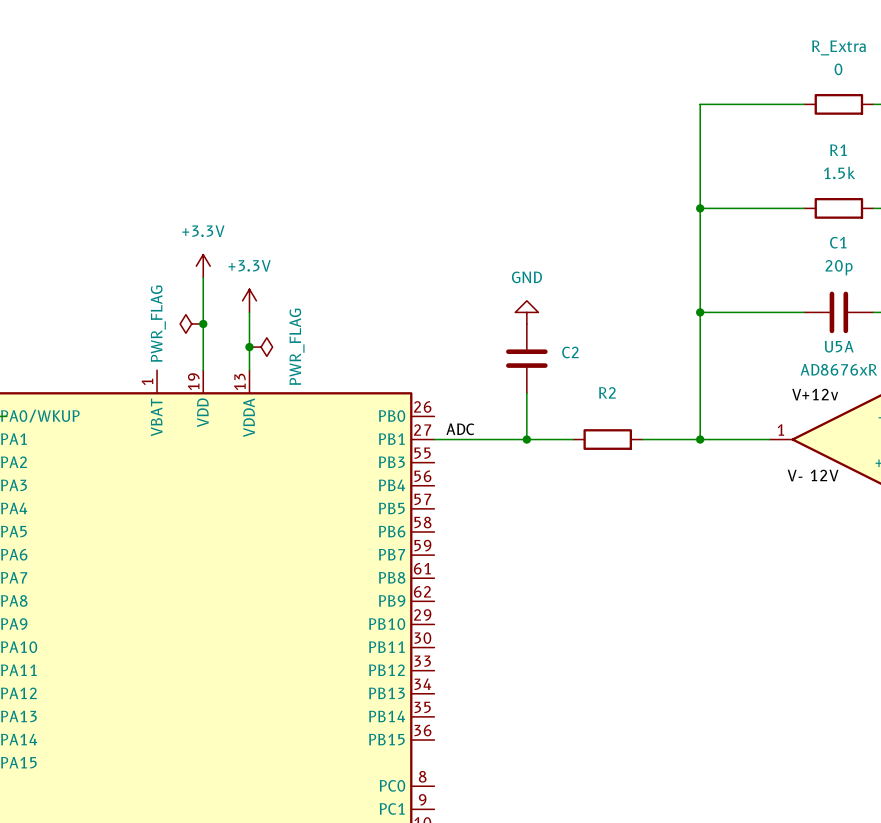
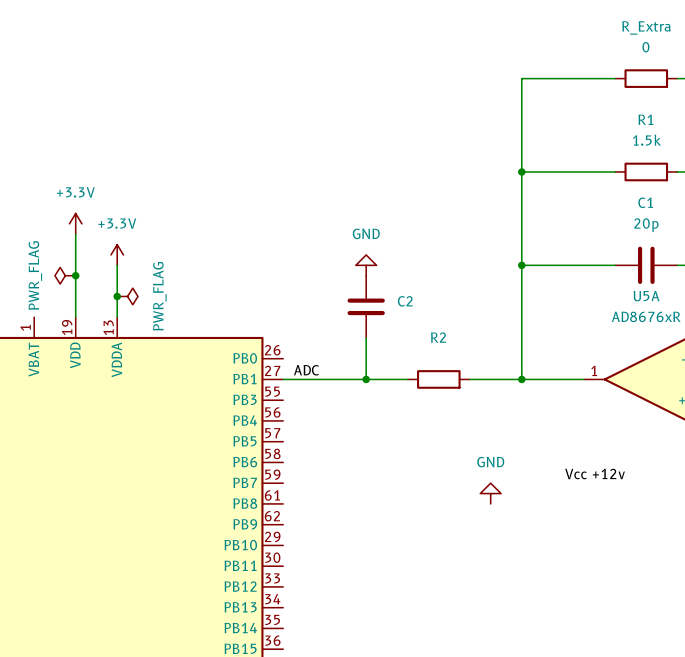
label: V+12v (815, 394) -> none
label: V- 12V (813, 475) -> none
label: none -> Vcc +12v (595, 474)
power symbol: none -> GND (490, 493)

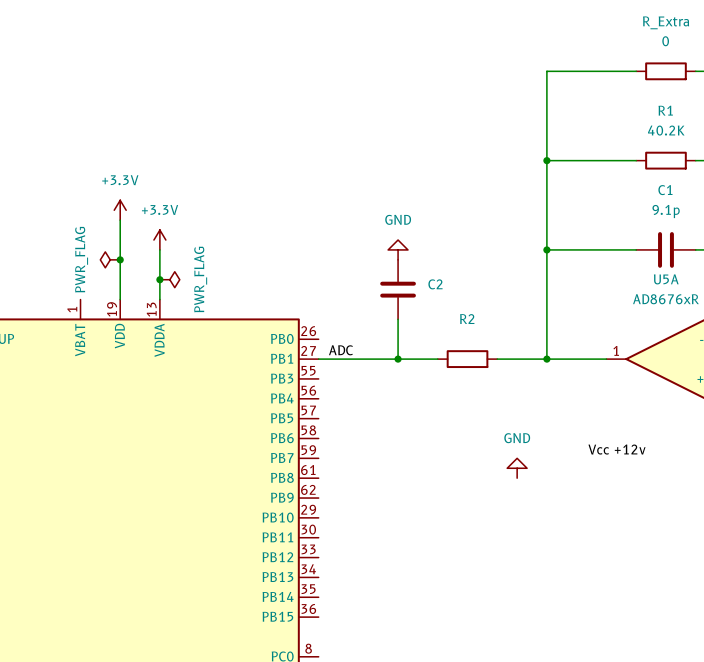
R1 value: 1.5k (646, 140) -> 40.2K (666, 130)
C1 value: 20p (646, 225) -> 9.1p (666, 211)

